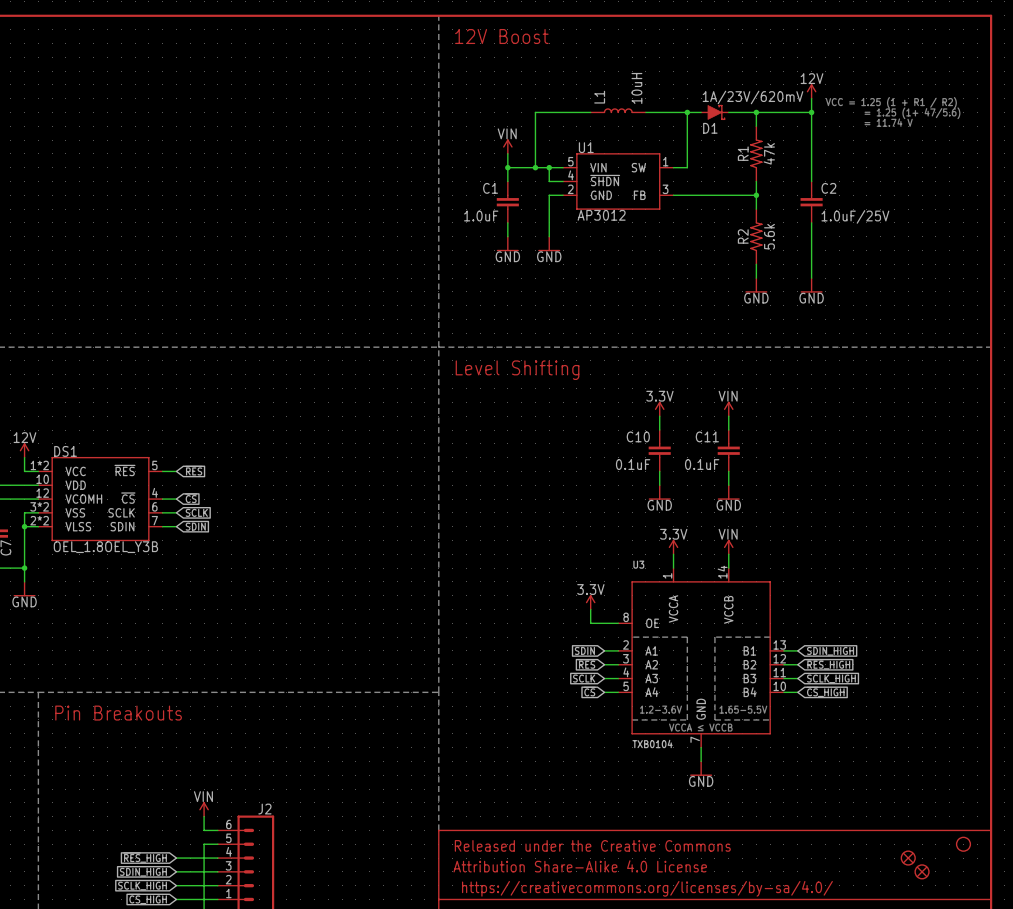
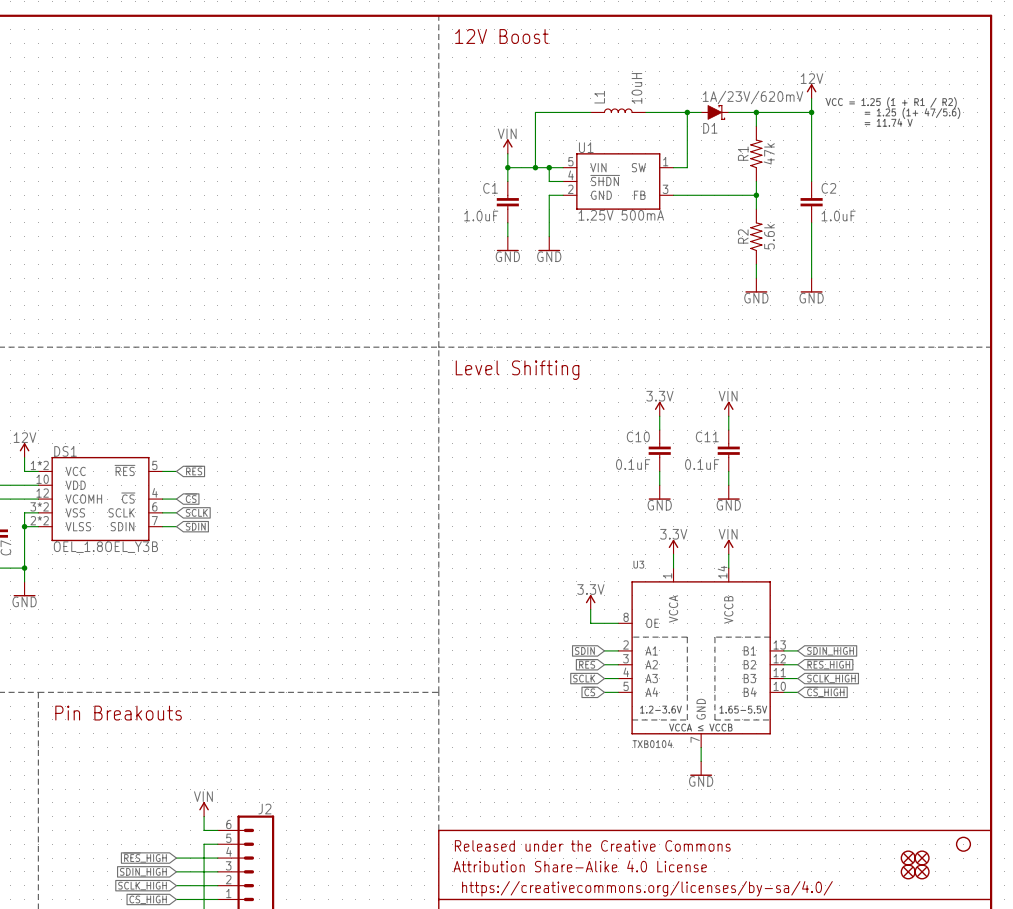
U1 value: AP3012 (601, 215) -> 1.25V 500mA (621, 215)
C2 value: 1.0uF/25V (855, 216) -> 1.0uF (838, 216)
part: none -> (922, 858)
part: none -> (908, 871)

